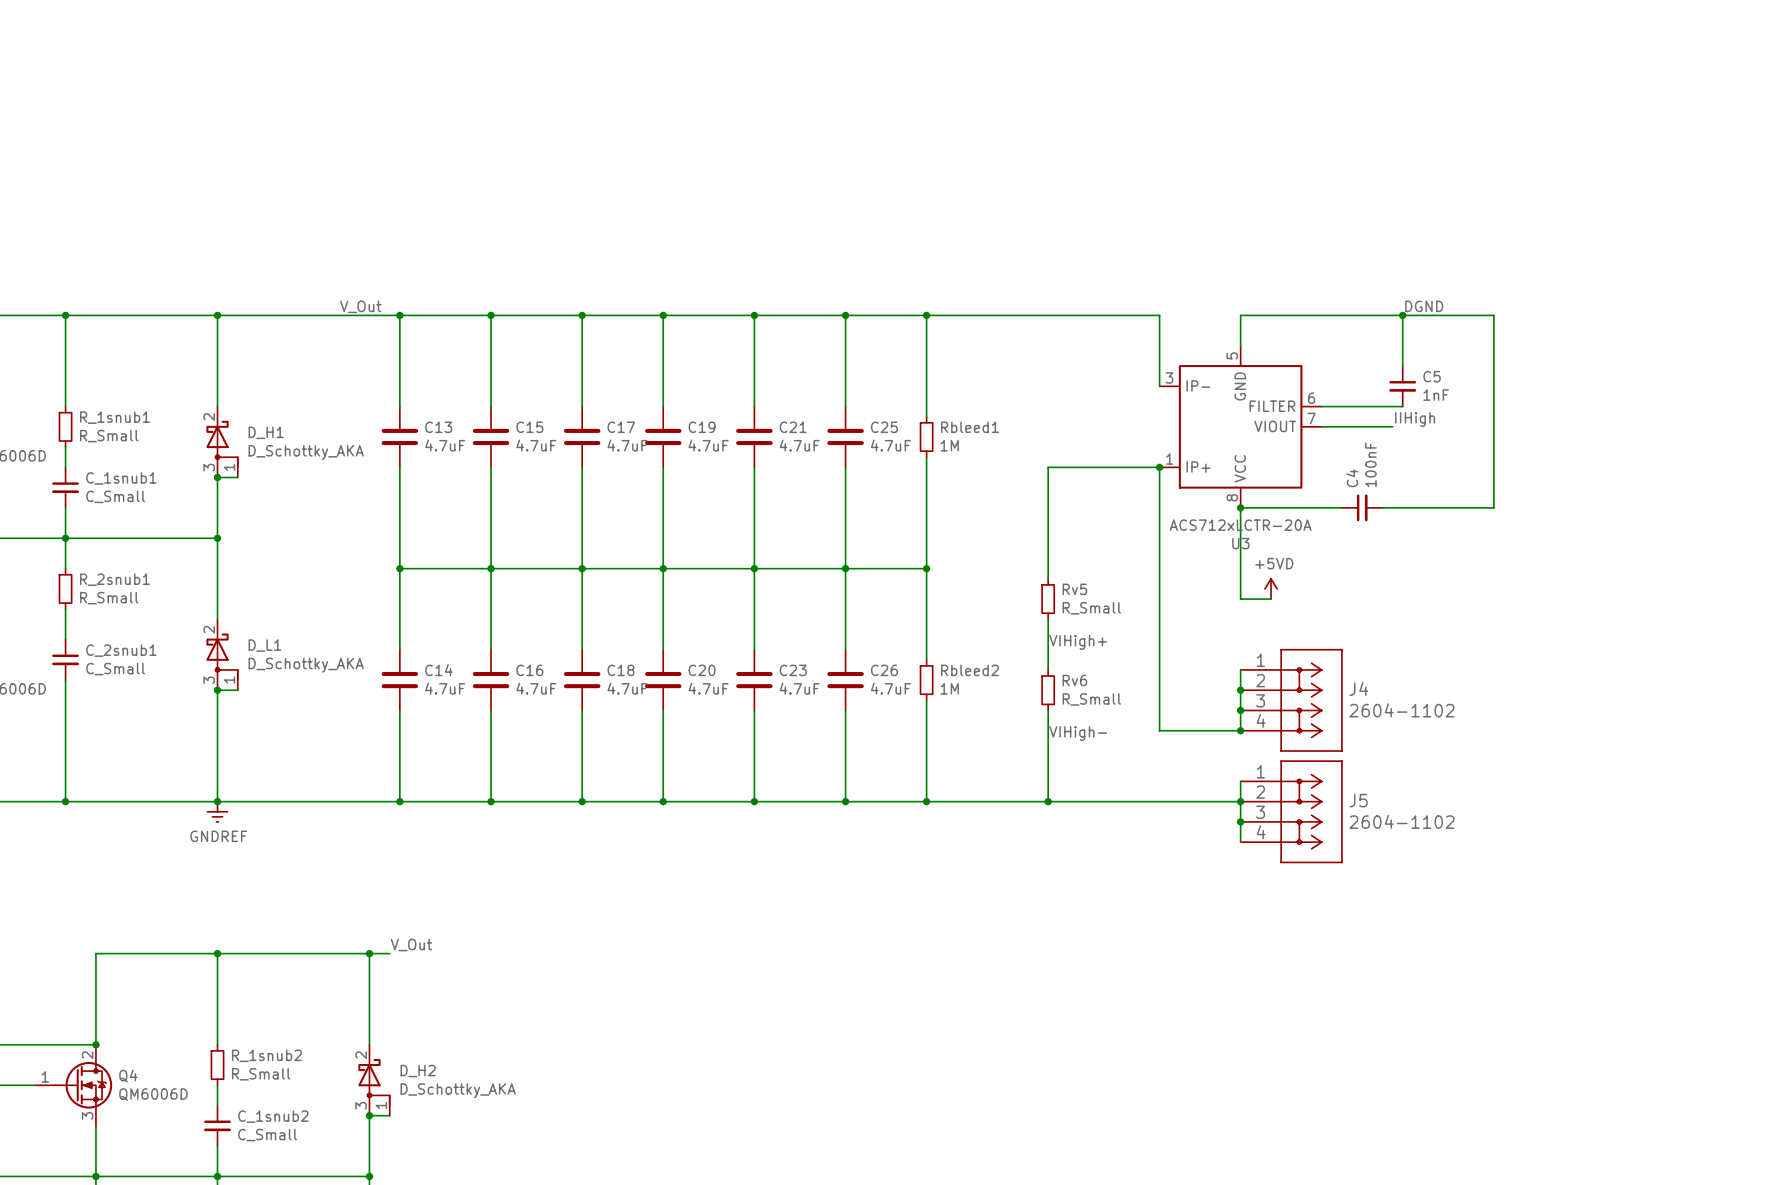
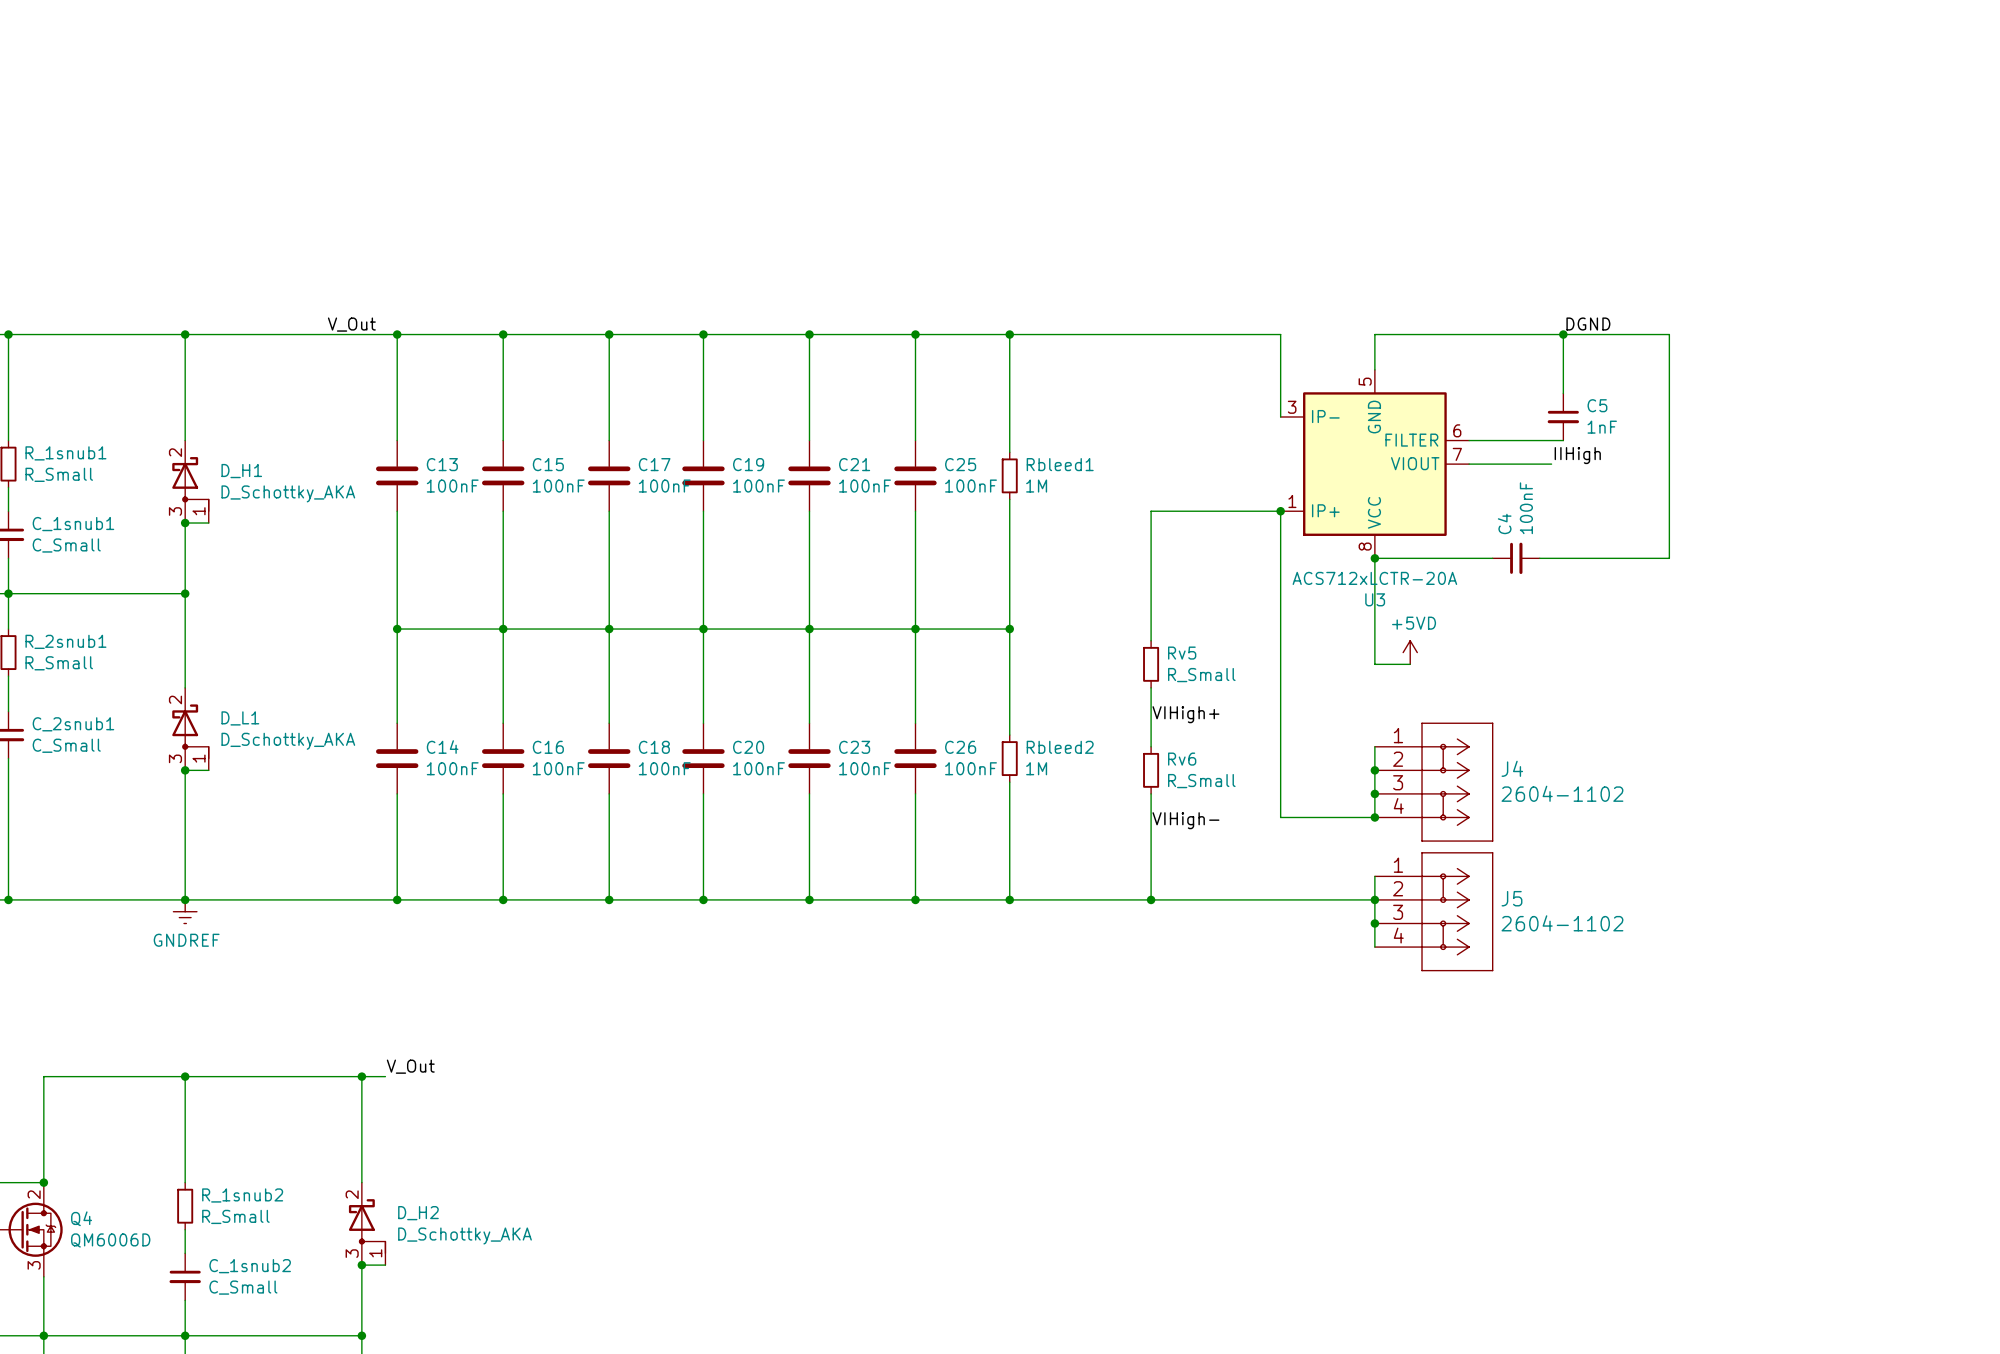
C13 value: 4.7uF (445, 445) -> 100nF (452, 486)
C15 value: 4.7uF (536, 445) -> 100nF (558, 486)
C17 value: 4.7uF (627, 445) -> 100nF (664, 486)
C19 value: 4.7uF (708, 445) -> 100nF (758, 486)
C21 value: 4.7uF (799, 445) -> 100nF (864, 486)
C25 value: 4.7uF (890, 445) -> 100nF (971, 486)
C14 value: 4.7uF (445, 688) -> 100nF (452, 768)
C16 value: 4.7uF (536, 688) -> 100nF (558, 768)
C18 value: 4.7uF (627, 688) -> 100nF (664, 768)
C20 value: 4.7uF (708, 688) -> 100nF (758, 768)
C23 value: 4.7uF (799, 688) -> 100nF (864, 768)
C26 value: 4.7uF (890, 688) -> 100nF (971, 768)

